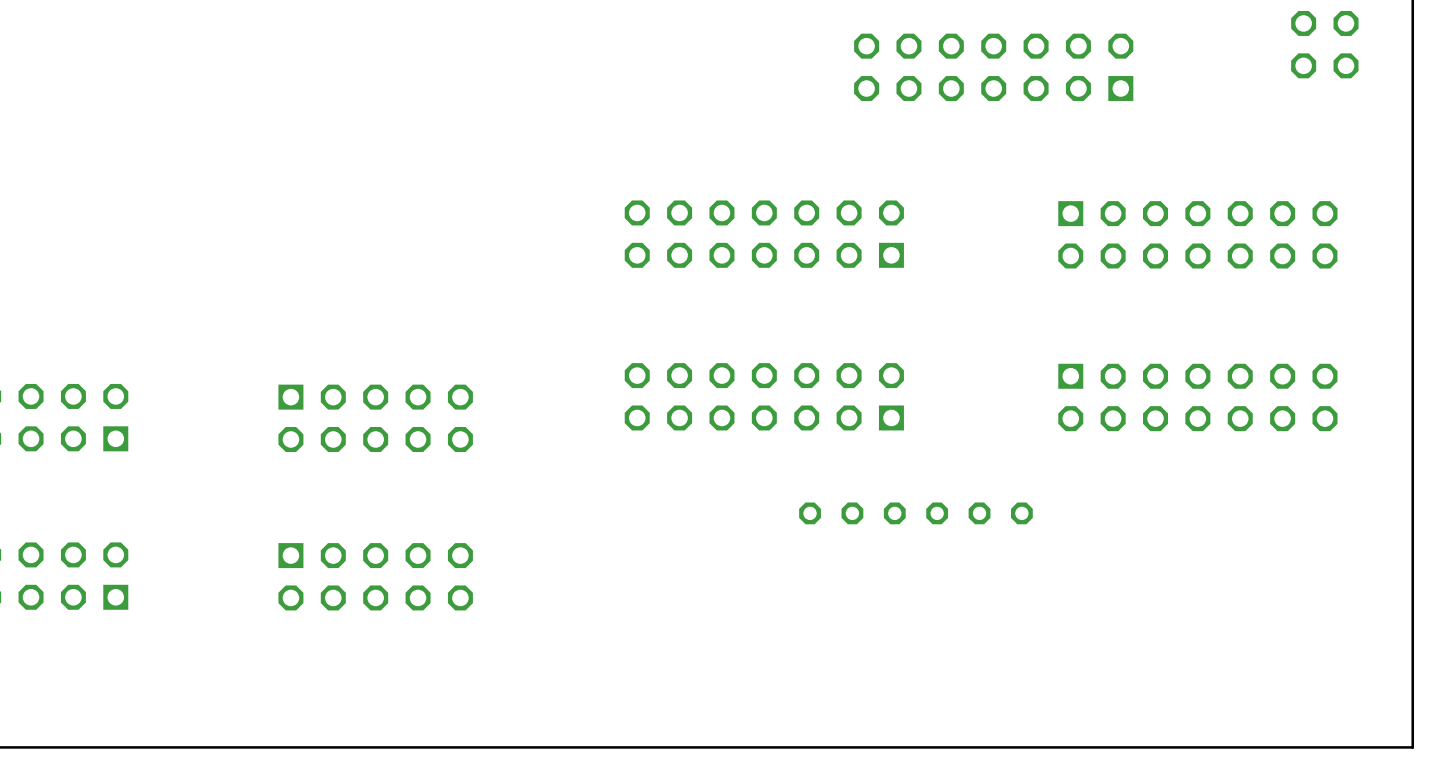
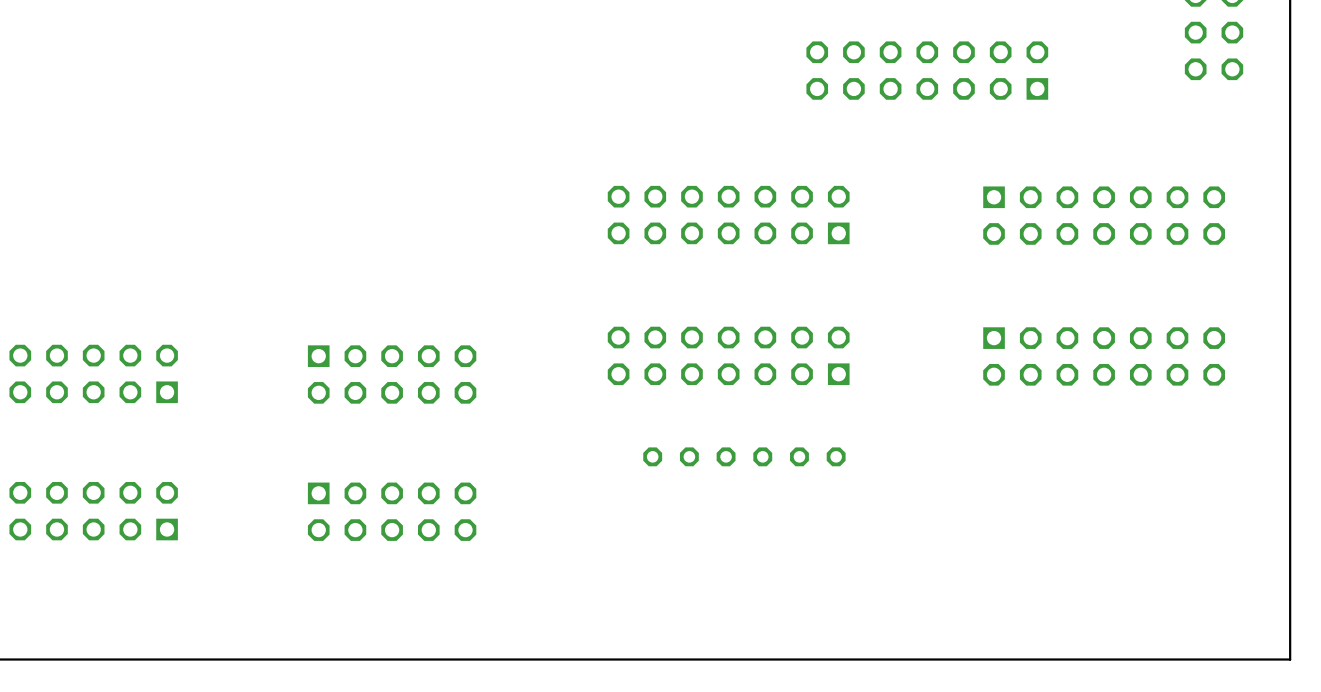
part position: (915, 513) -> (744, 456)

